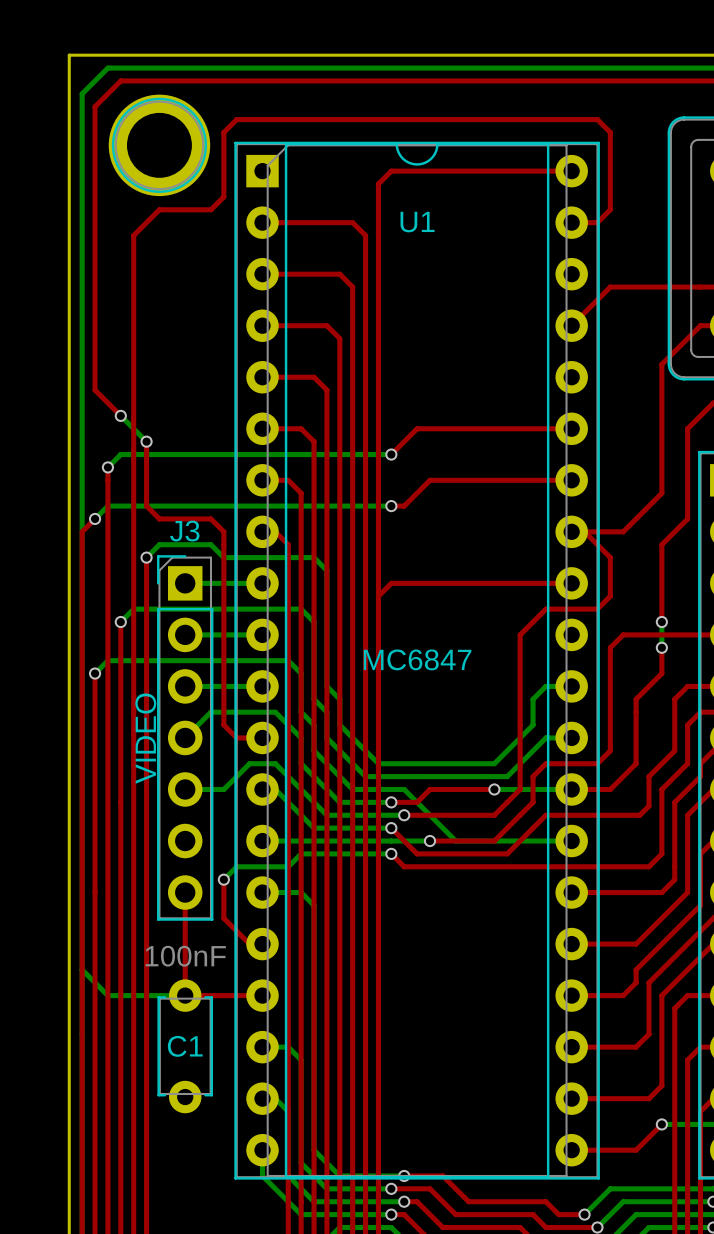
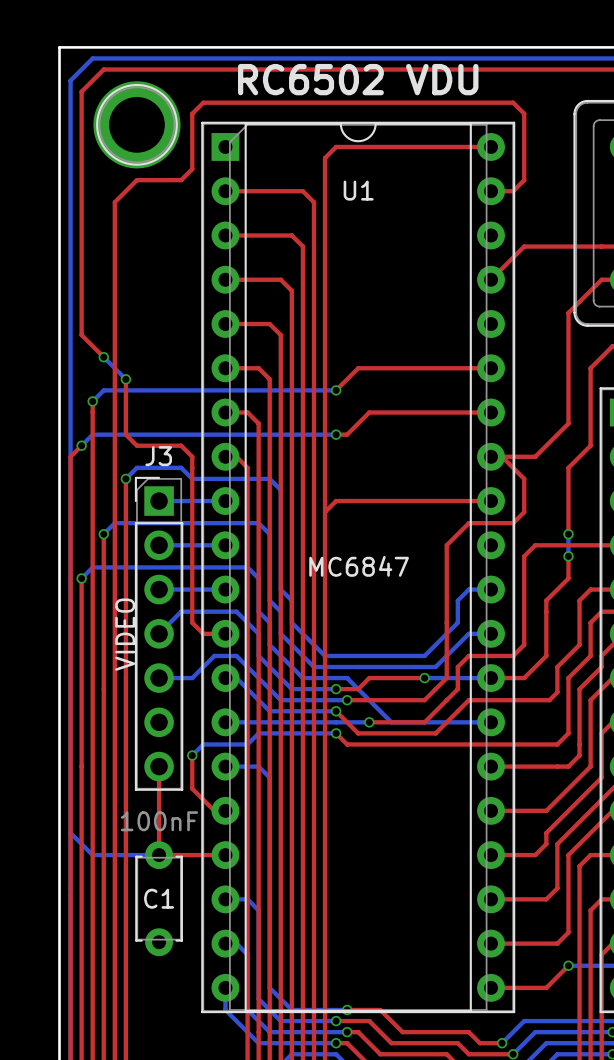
text: none -> RC6502 VDU (358, 79)

